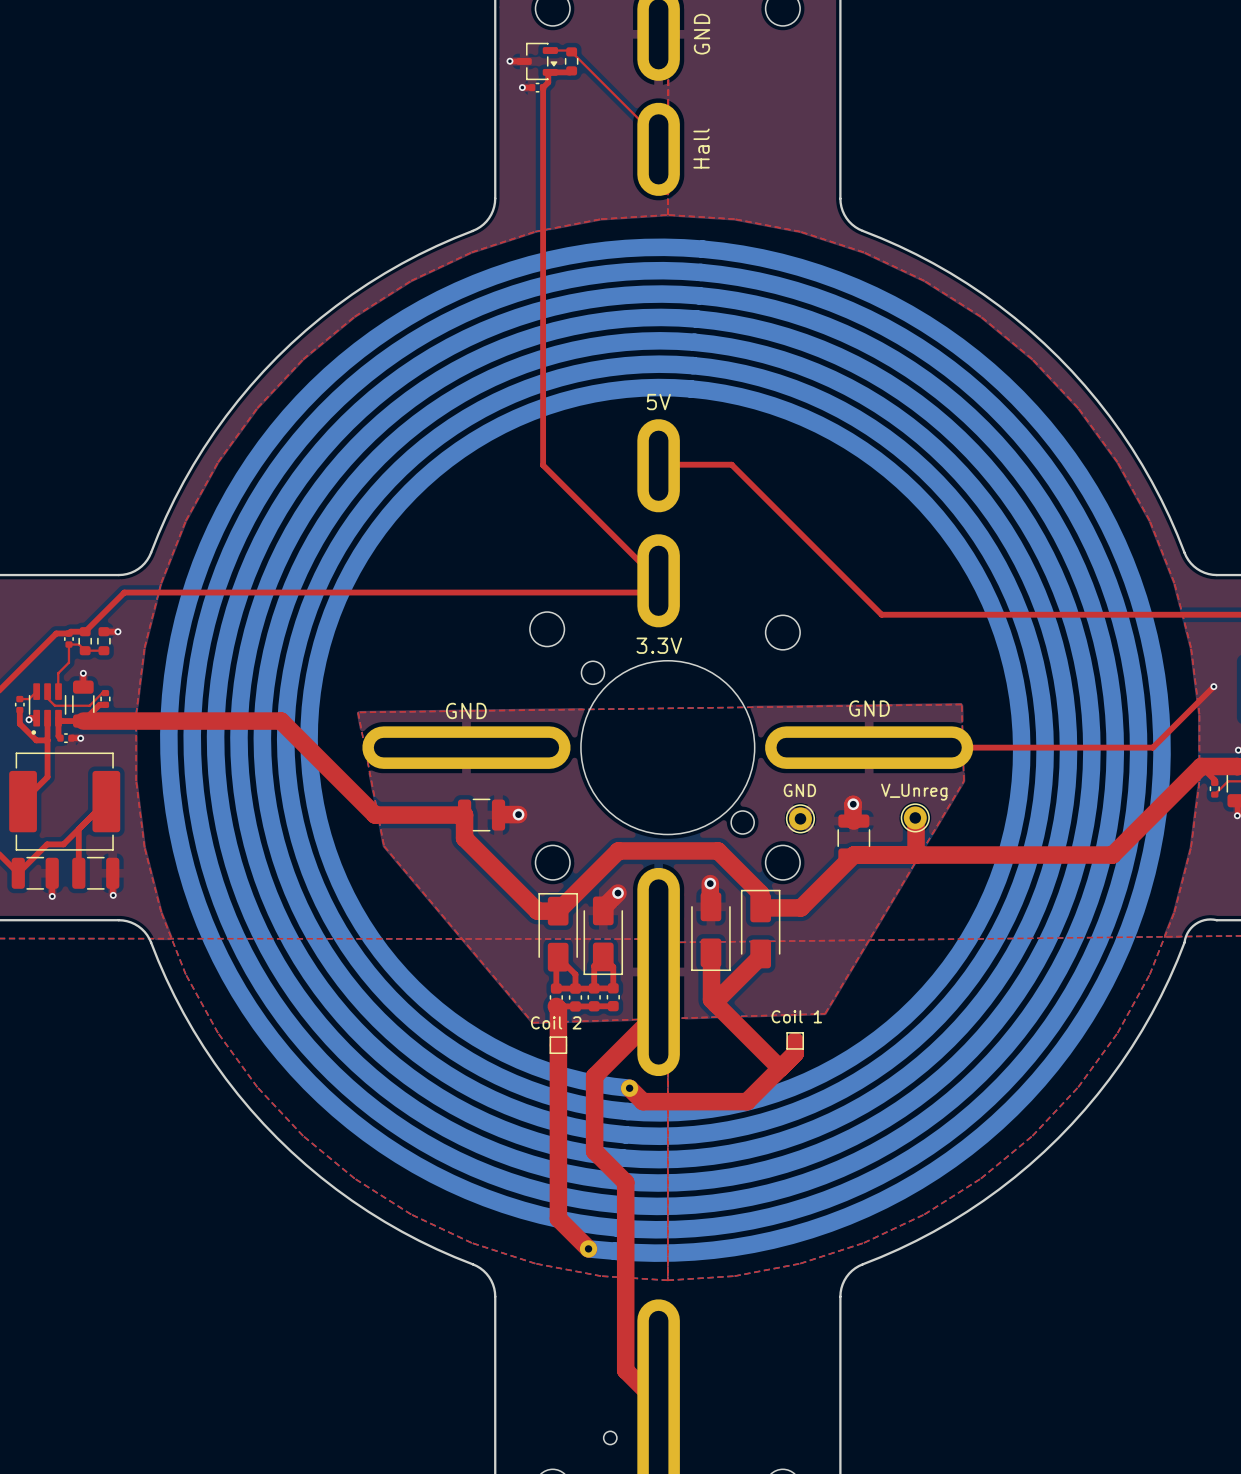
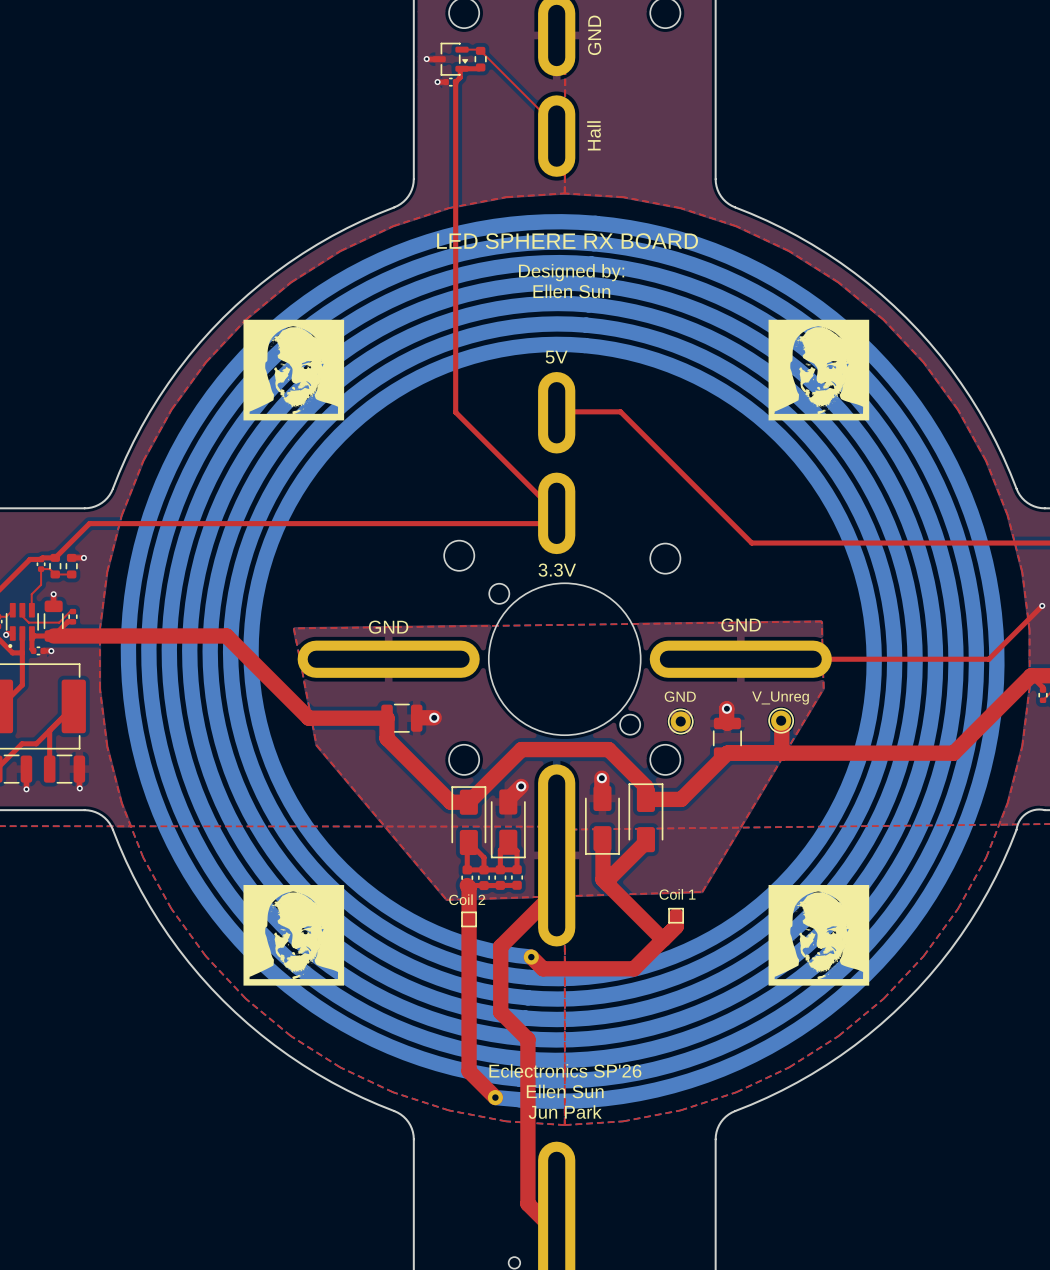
text: none -> LED SPHERE RX BOARD (567, 241)
text: none -> Designed by: (571, 272)
text: none -> Ellen Sun (571, 291)
drawing: none -> [243, 319, 345, 421]
drawing: none -> [768, 319, 870, 421]
drawing: none -> [243, 884, 345, 986]
drawing: none -> [768, 884, 870, 986]
text: none -> Eclectronics SP'26 (565, 1070)
text: none -> Ellen Sun (565, 1091)
text: none -> Jun Park (565, 1112)

